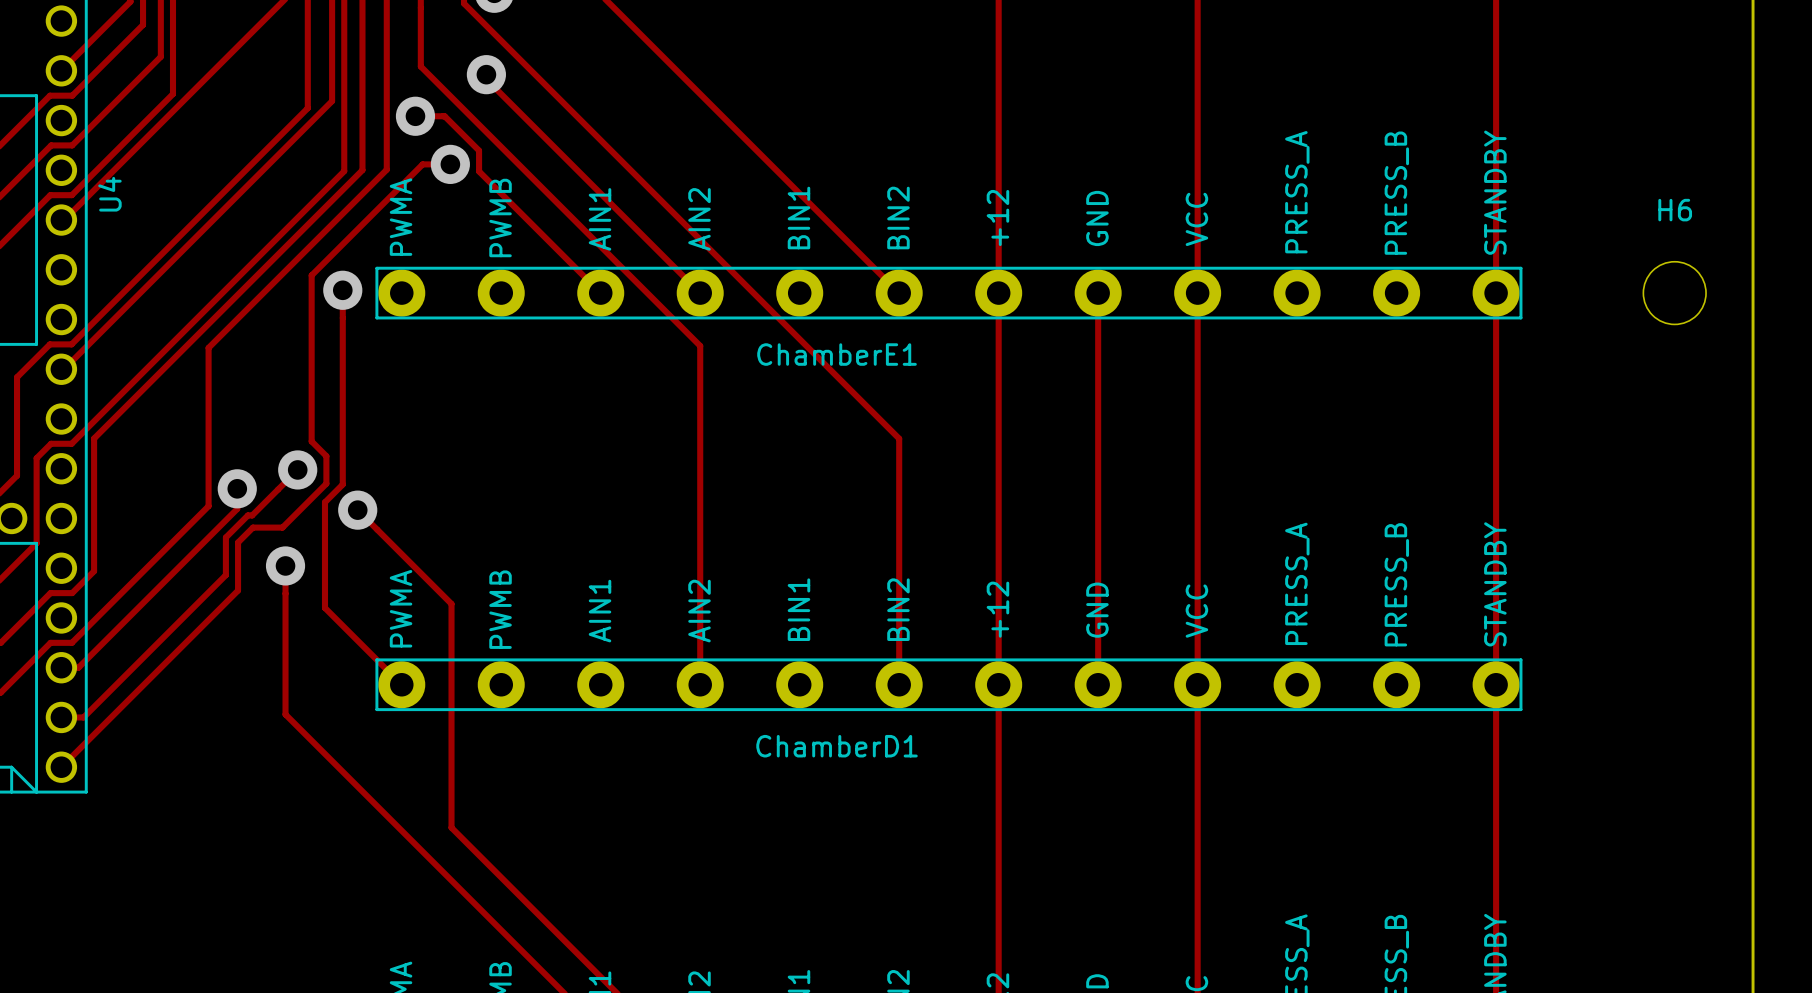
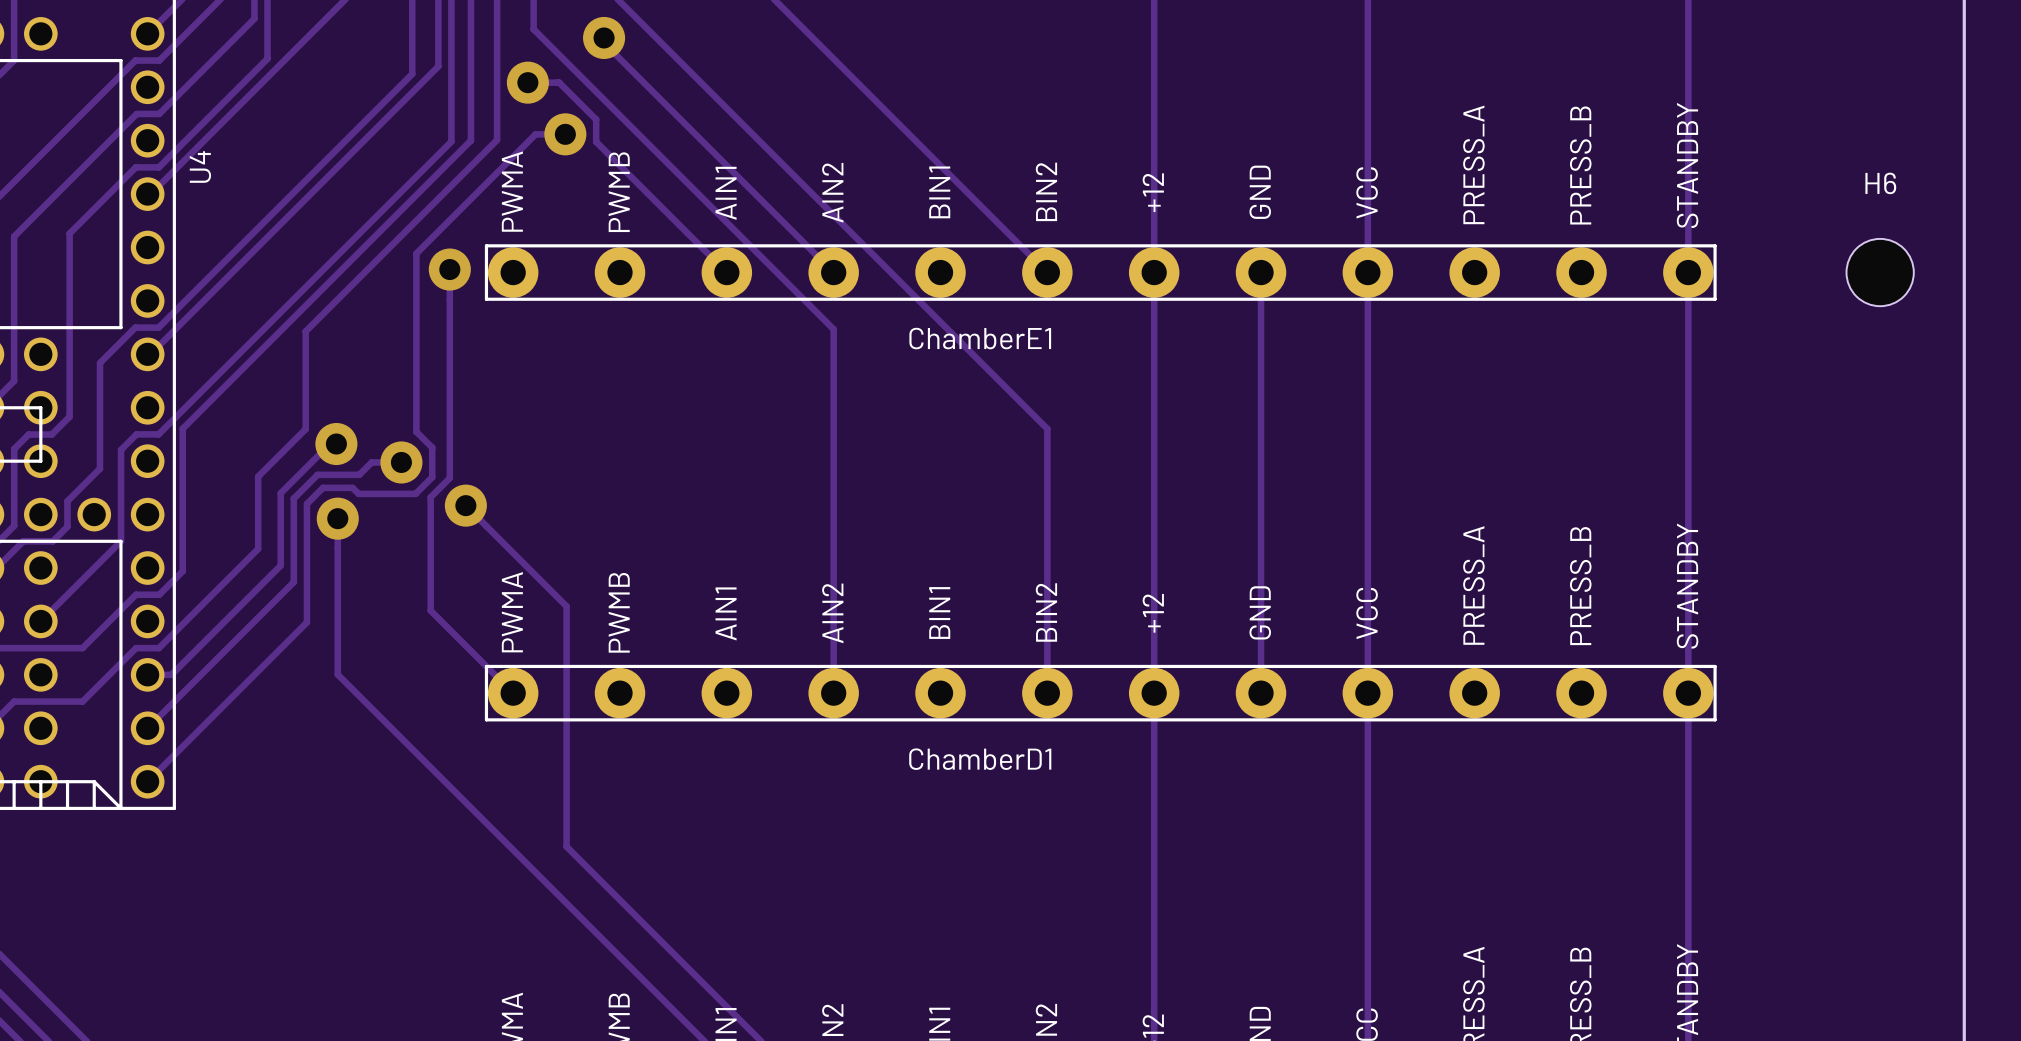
track: (208, 438) (208, 506) (164, 550) -> (305, 429) (258, 476) (258, 548)
via: none -> (336, 444)
track: (297, 469) (252, 515) (247, 515) (225, 537) (225, 575) (83, 717) (61, 717) -> (401, 462) (371, 462) (359, 474) (317, 474) (293, 498) (293, 582) (147, 728)
track: (237, 488) (237, 508) (78, 667) -> (336, 444) (329, 444) (280, 493) (280, 565) (171, 674) (166, 674)
via: (237, 488) -> none
track: (310, 499) (282, 527) (252, 527) (238, 542) (238, 590) (209, 618) -> (415, 493) (358, 493) (352, 487) (322, 487) (306, 503) (306, 622)
via: none -> (337, 518)
track: (285, 565) (285, 714) -> (337, 518) (337, 674) (388, 725)
via: (285, 565) -> none

